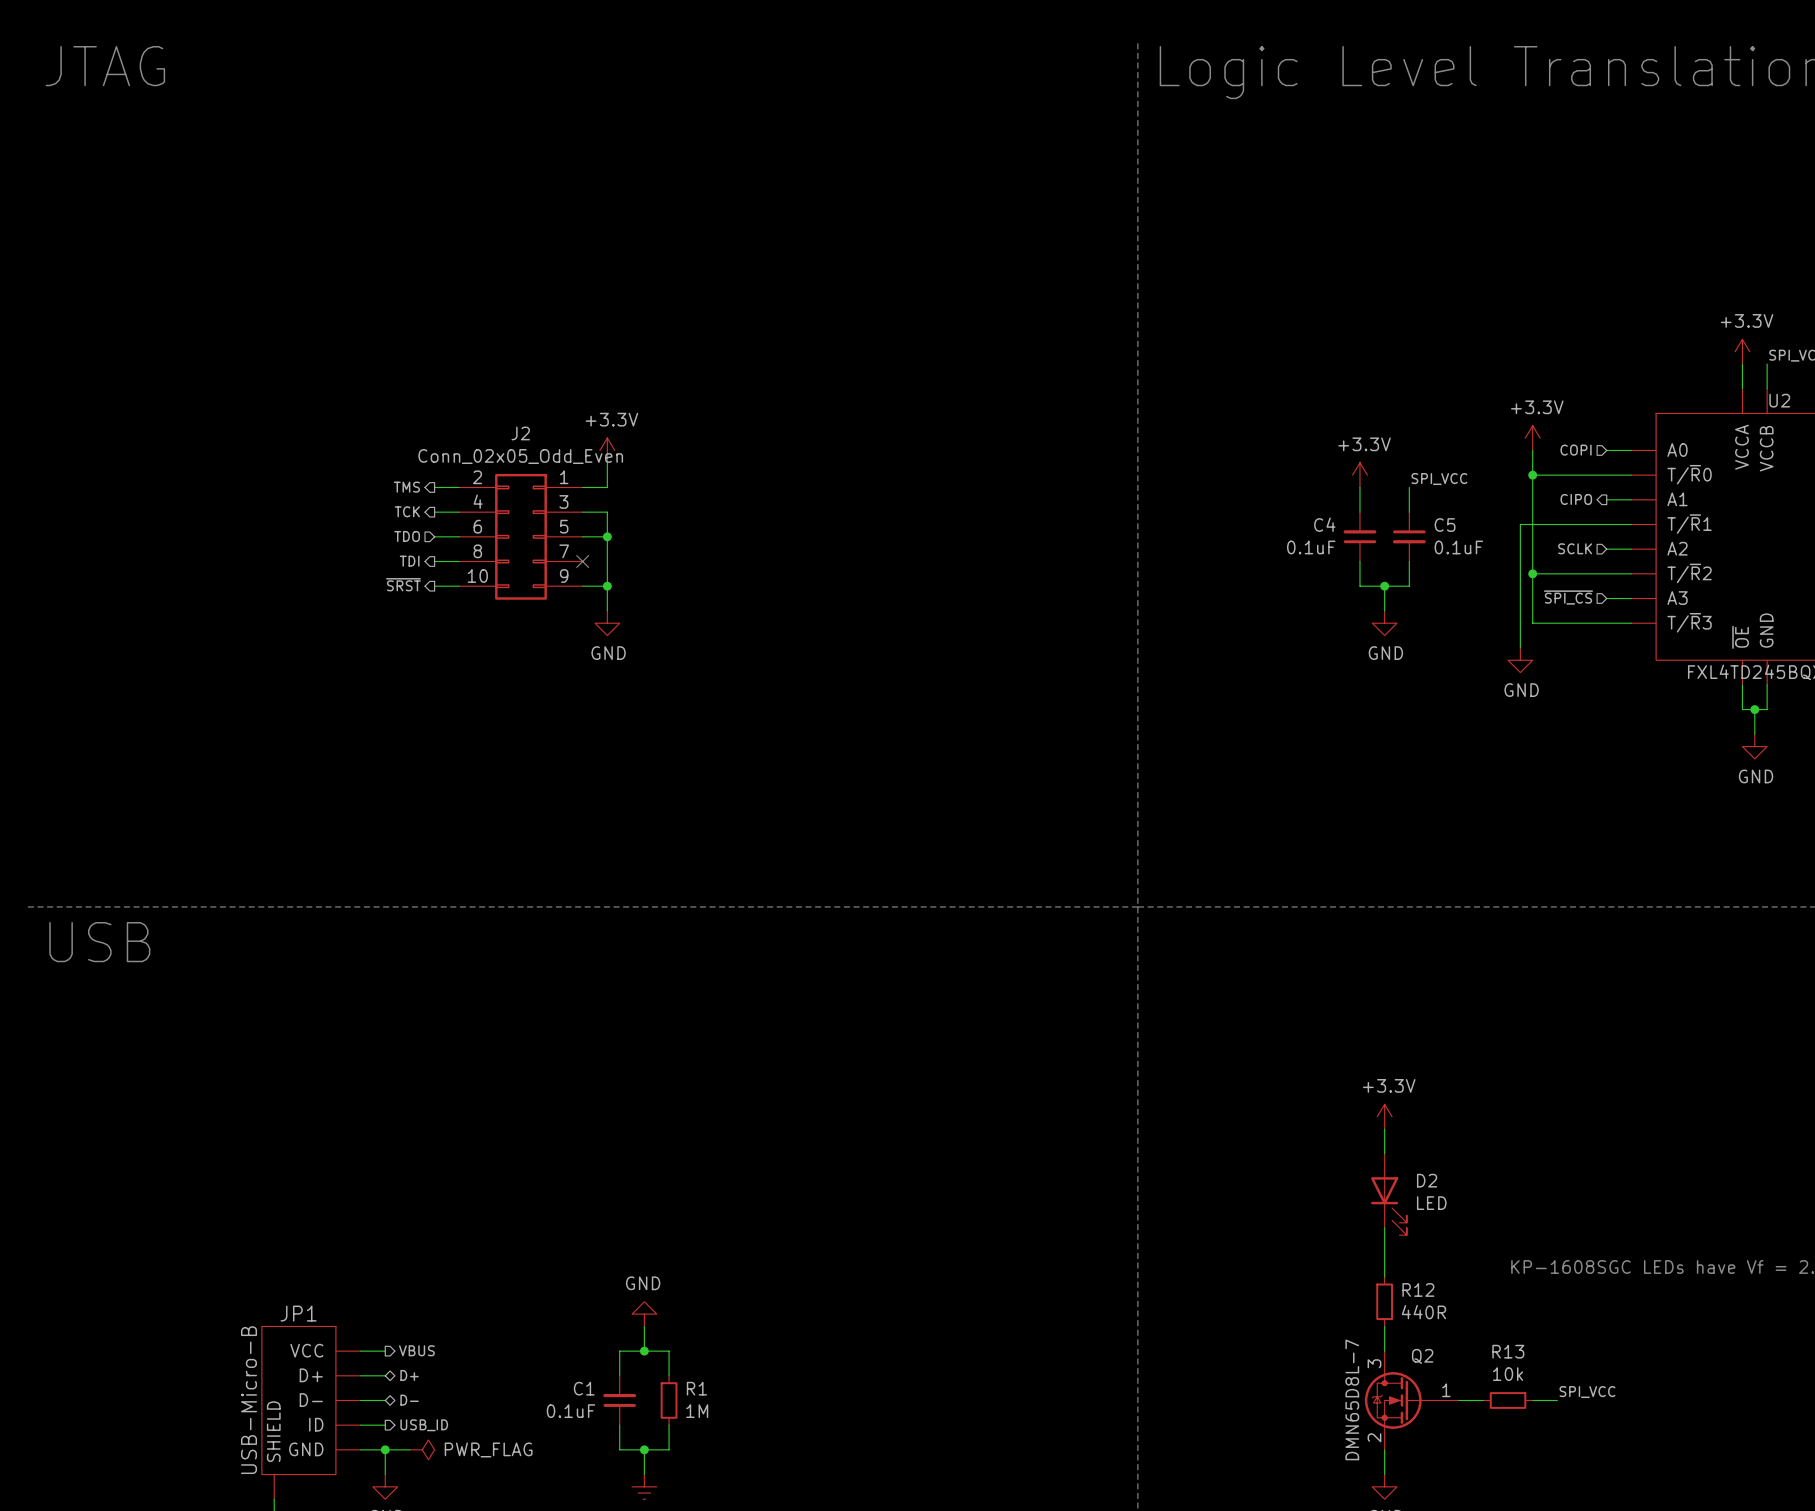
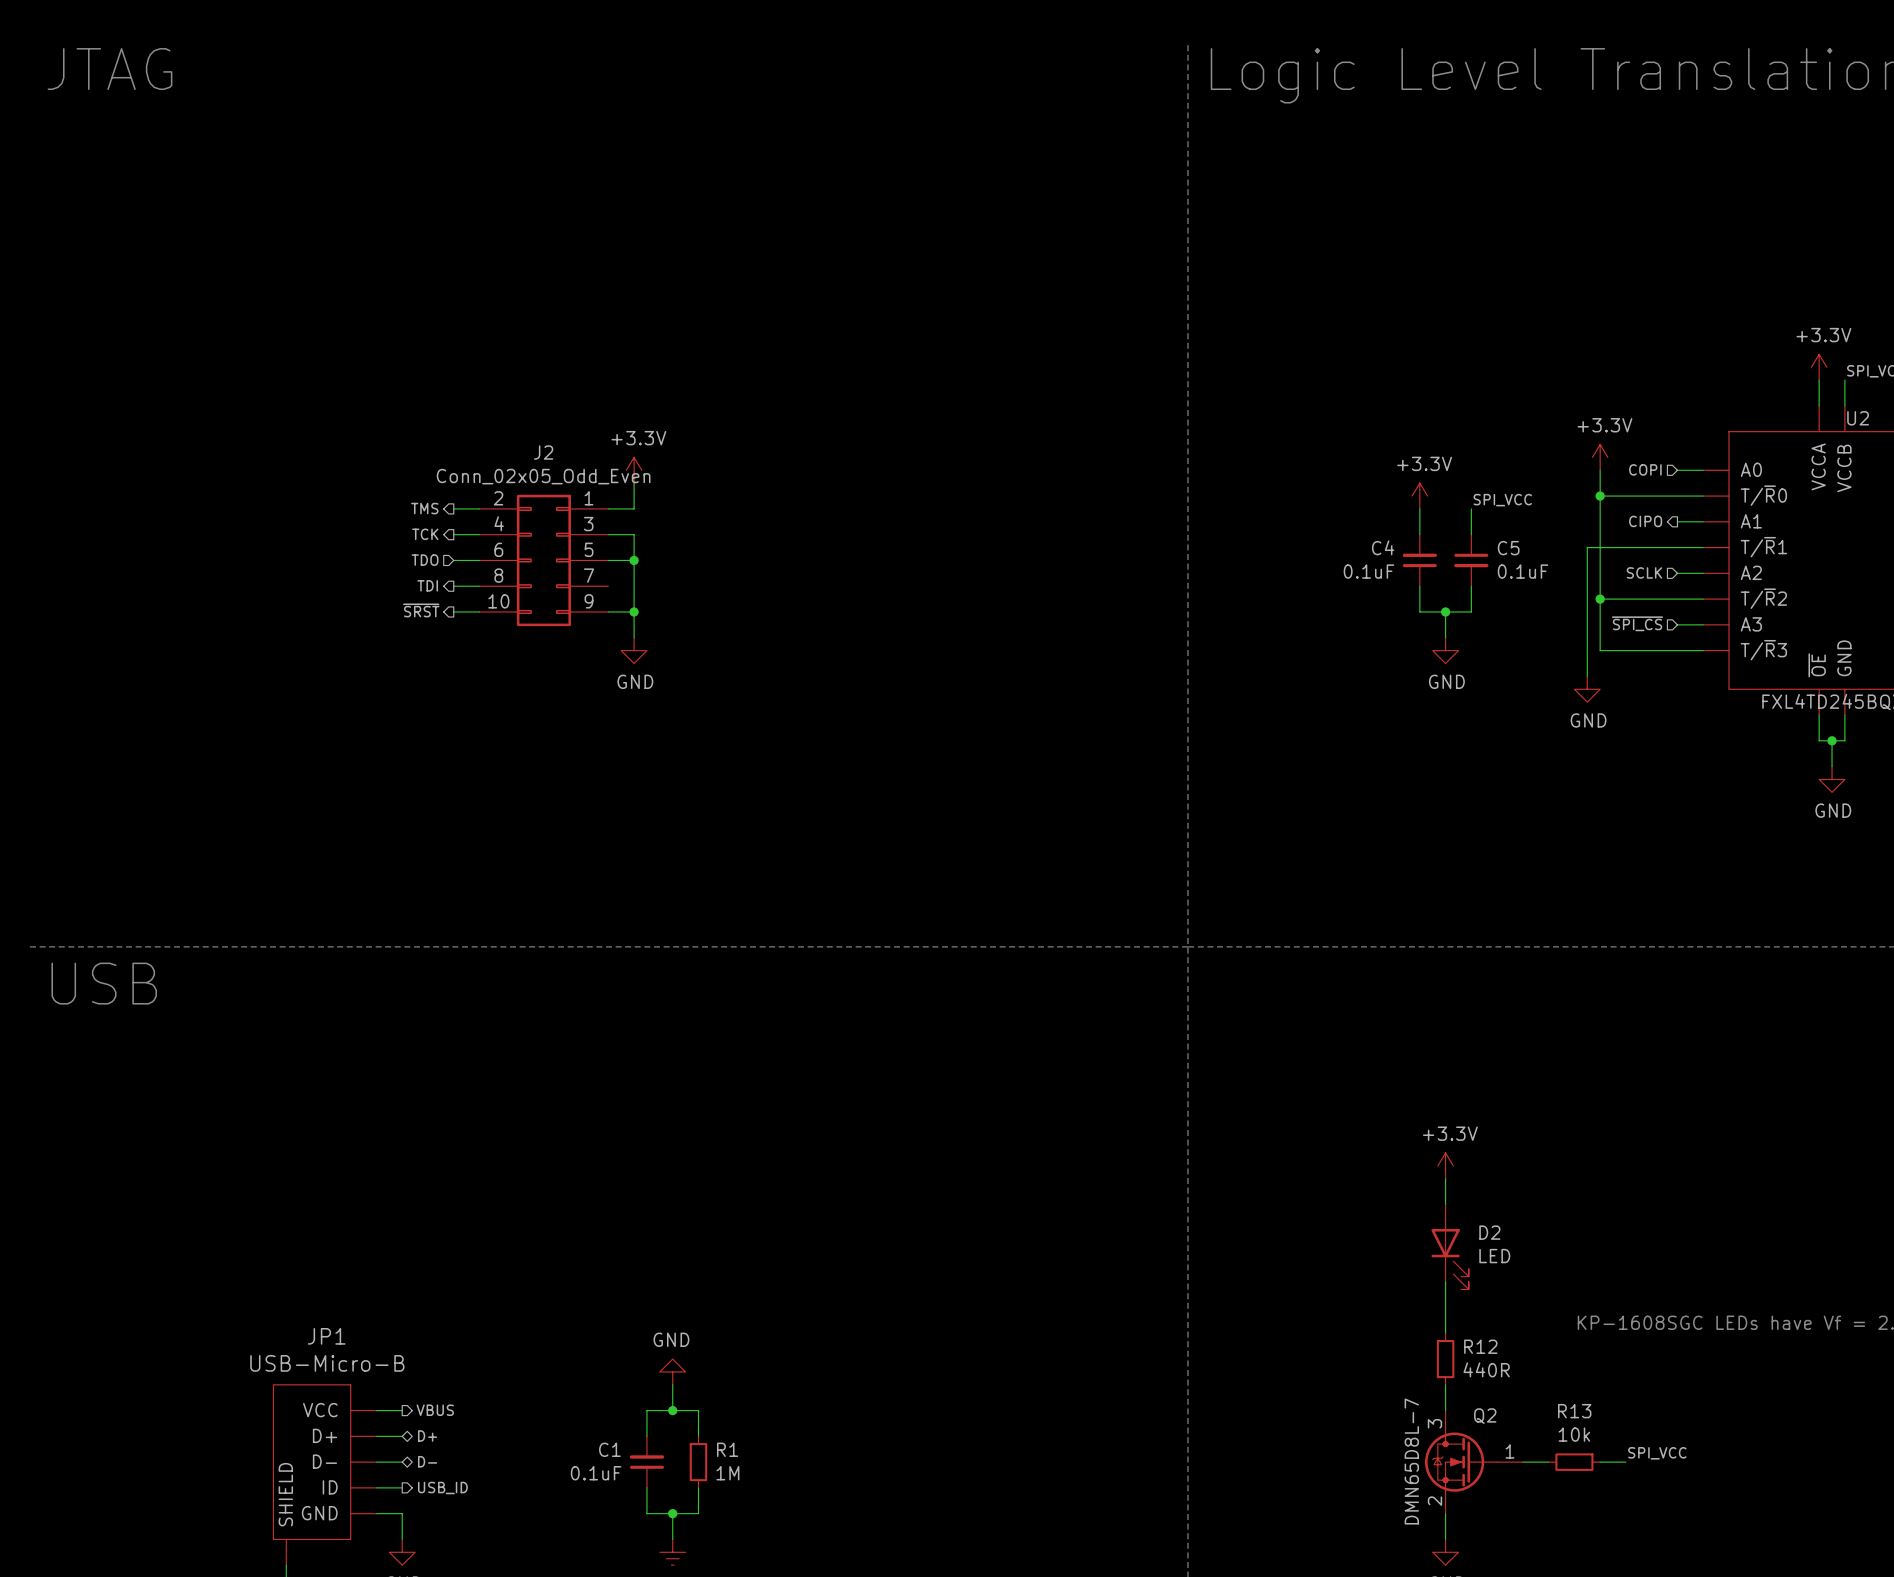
no-connect mark: (582, 561) -> none
JP1 name position: JP1 (298, 1313) -> JP1 (326, 1336)
JP1 value rotation: 0° (249, 1400) -> 90° clockwise (327, 1363)
wire: (385, 1449) (409, 1449) -> none
junction: (385, 1449) -> none
power symbol: PWR_FLAG (422, 1449) -> none

